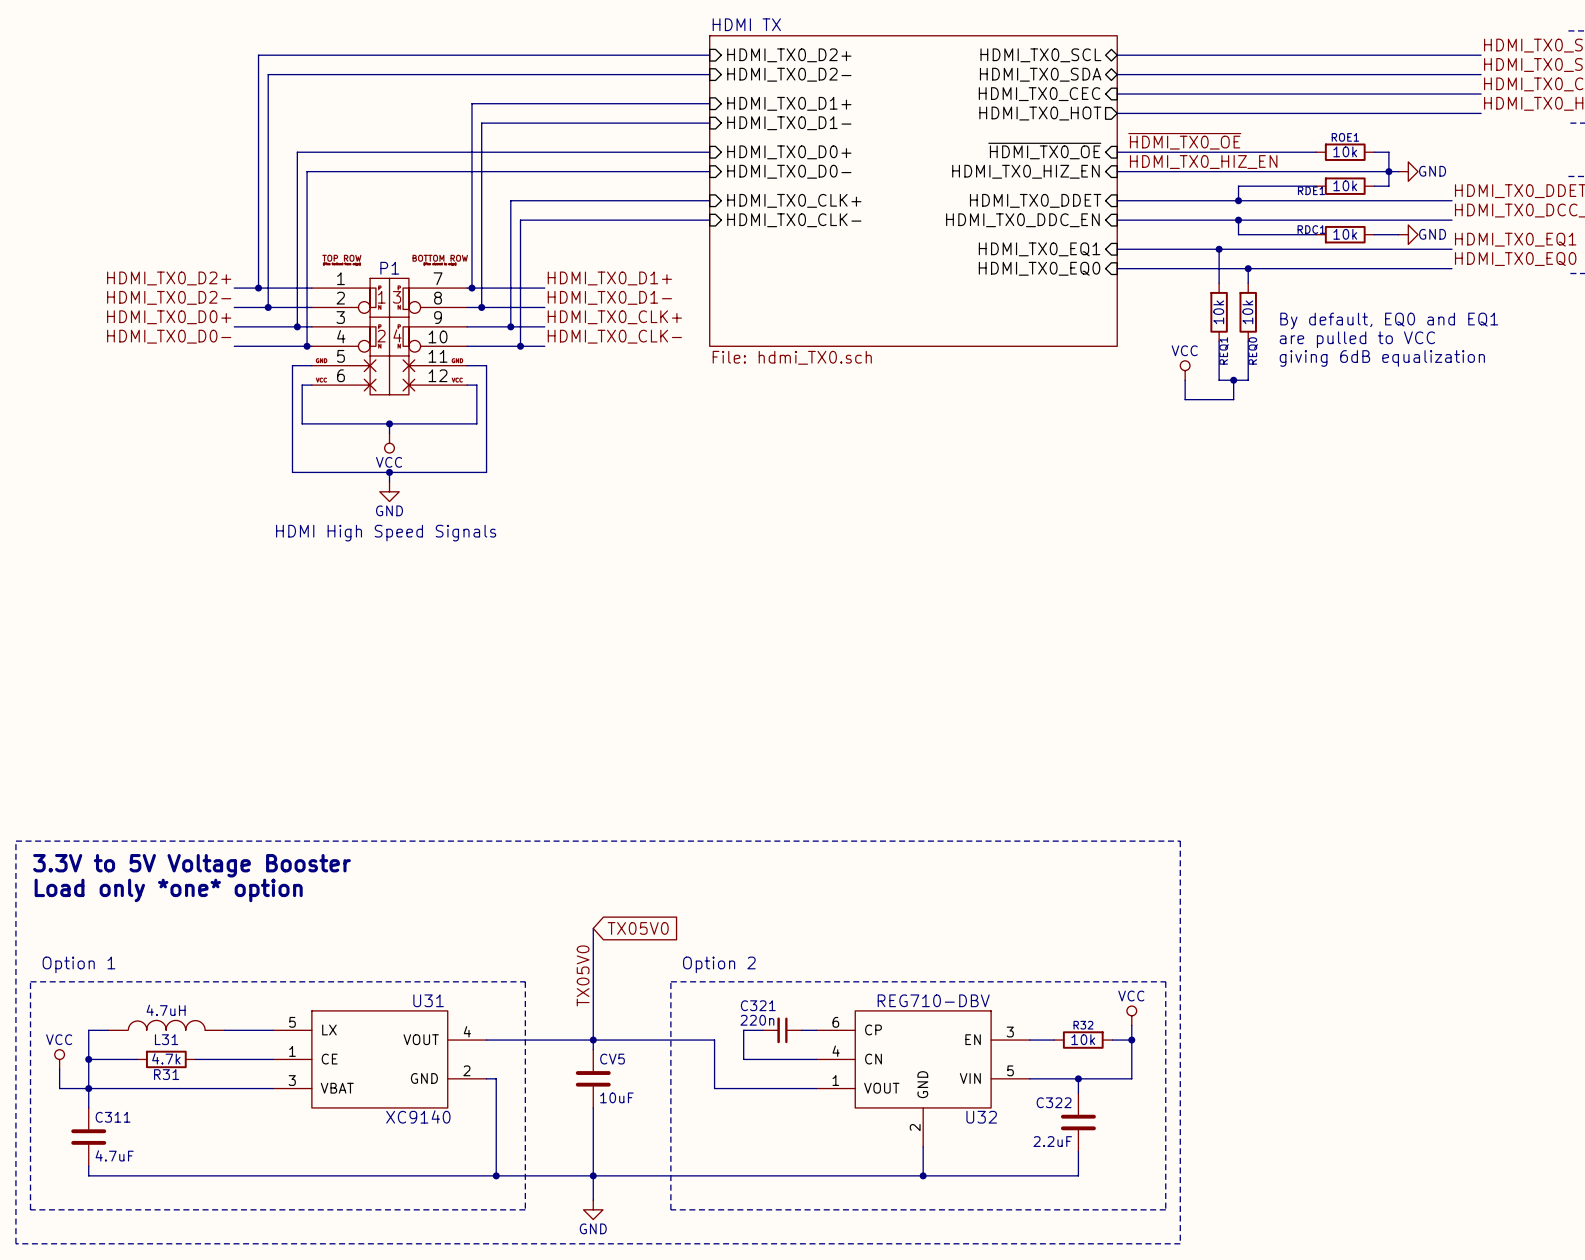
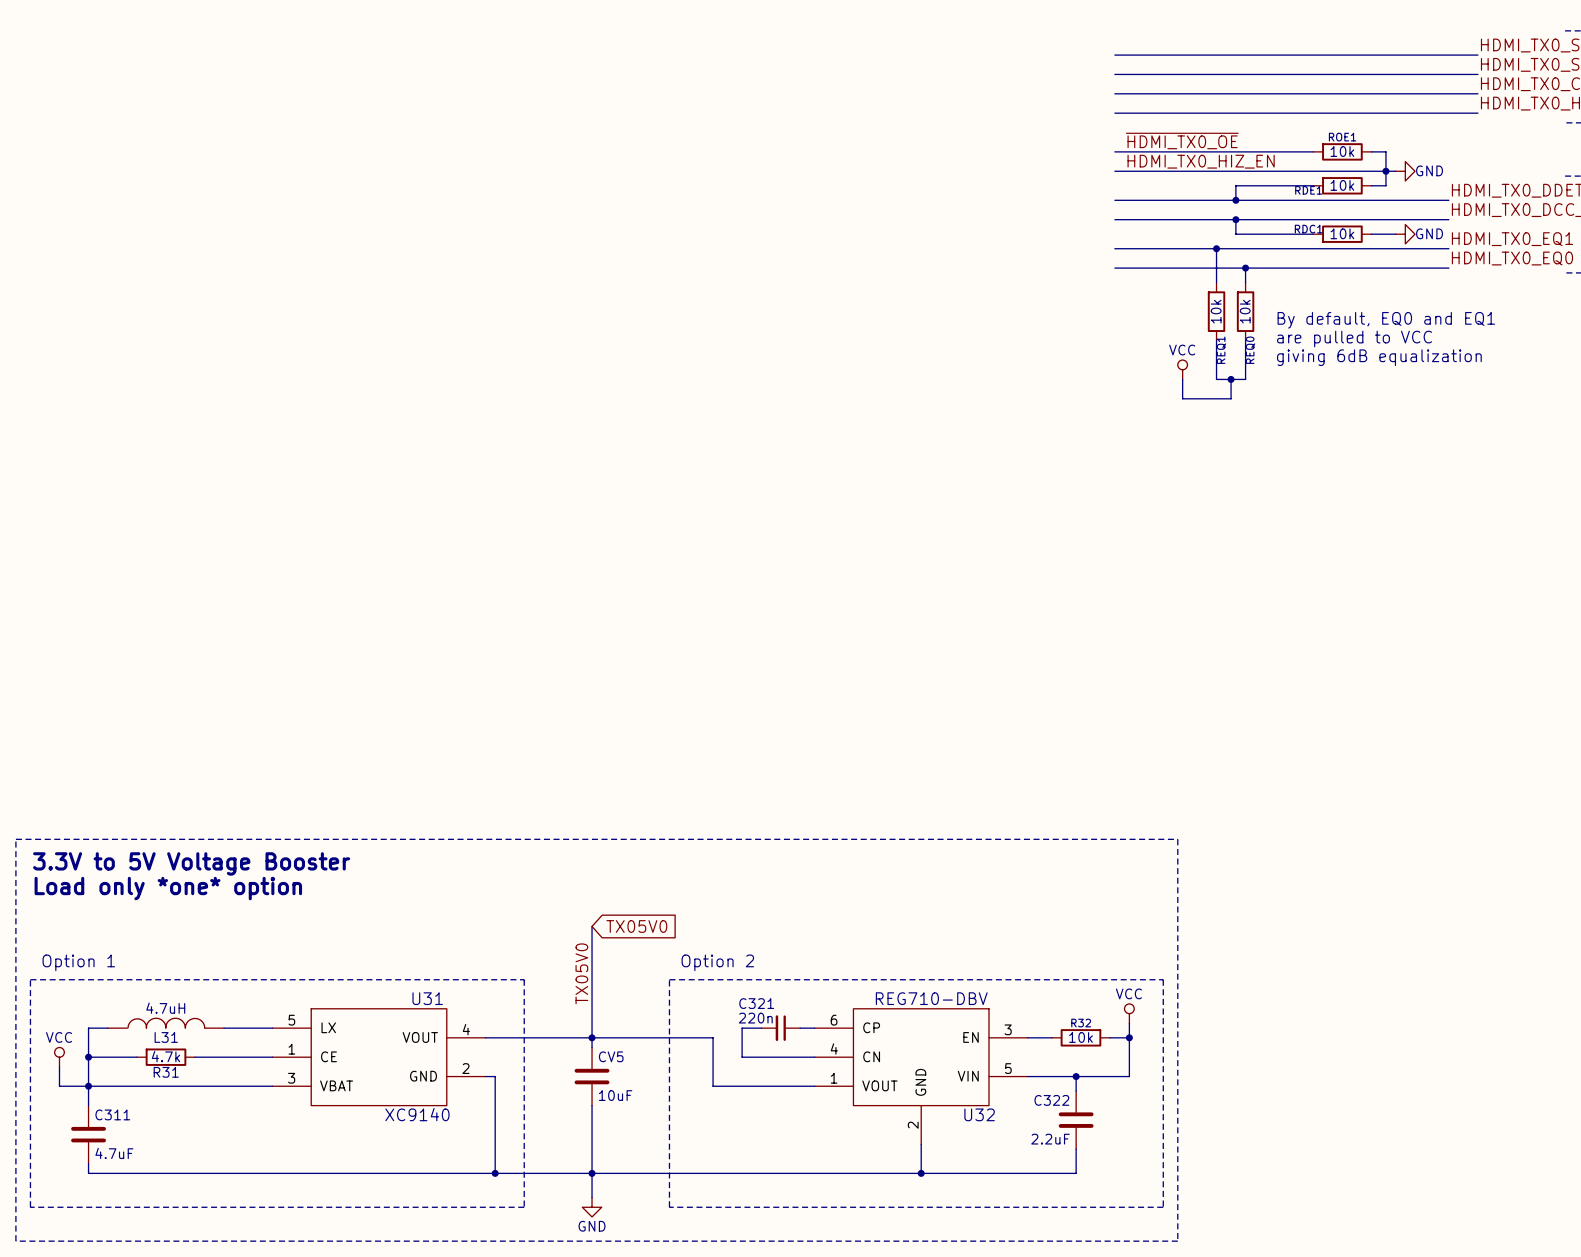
wire: (709, 55) (258, 55) (258, 288) -> none
sheet pin: HDMI_TX0_D2+ (789, 55) -> none
sheet pin: HDMI_TX0_SCL (1040, 55) -> none
wire: (709, 74) (268, 74) (268, 307) -> none
sheet pin: HDMI_TX0_D2- (789, 74) -> none
sheet pin: HDMI_TX0_SDA (1040, 74) -> none
sheet pin: HDMI_TX0_CEC (1039, 94) -> none
wire: (709, 103) (471, 103) (471, 288) -> none
sheet pin: HDMI_TX0_D1+ (789, 103) -> none
sheet pin: HDMI_TX0_HOT (1040, 113) -> none
wire: (709, 123) (481, 123) (481, 307) -> none
sheet pin: HDMI_TX0_D1- (789, 123) -> none
sheet pin: ~{HDMI_TX0_OE} (1044, 151) -> none
wire: (709, 152) (297, 152) (297, 326) -> none
sheet pin: HDMI_TX0_D0+ (789, 152) -> none
wire: (709, 171) (307, 171) (307, 346) -> none
sheet pin: HDMI_TX0_D0- (789, 171) -> none
sheet pin: HDMI_TX0_HIZ_EN (1025, 171) -> none
sheet HDMI TX: File: hdmi_TX0.sch (913, 191) -> none
wire: (709, 200) (510, 200) (510, 326) -> none
sheet pin: HDMI_TX0_CLK+ (794, 200) -> none
sheet pin: HDMI_TX0_DDET (1035, 200) -> none
wire: (709, 220) (520, 220) (520, 346) -> none
sheet pin: HDMI_TX0_CLK- (794, 220) -> none
sheet pin: HDMI_TX0_DDC_EN (1022, 220) -> none
sheet pin: HDMI_TX0_EQ1 (1039, 249) -> none
sheet pin: HDMI_TX0_EQ0 (1039, 268) -> none
label: HDMI_TX0_D2+ (169, 278) -> none
label: HDMI_TX0_D1+ (609, 278) -> none
wire: (234, 288) (311, 288) -> none
junction: (258, 288) -> none
wire: (467, 288) (544, 288) -> none
junction: (471, 288) -> none
label: HDMI_TX0_D2- (169, 297) -> none
label: HDMI_TX0_D1- (609, 297) -> none
wire: (234, 307) (311, 307) -> none
junction: (268, 307) -> none
wire: (467, 307) (544, 307) -> none
junction: (481, 307) -> none
label: HDMI_TX0_D0+ (169, 317) -> none
label: HDMI_TX0_CLK+ (614, 317) -> none
wire: (234, 326) (311, 326) -> none
junction: (297, 326) -> none
wire: (467, 326) (544, 326) -> none
junction: (510, 326) -> none
label: HDMI_TX0_D0- (169, 336) -> none
P1: (389, 336) -> none
label: HDMI_TX0_CLK- (614, 336) -> none
wire: (234, 346) (311, 346) -> none
junction: (307, 346) -> none
wire: (467, 346) (544, 346) -> none
junction: (520, 346) -> none
wire: (311, 365) (292, 365) (292, 472) (486, 472) (486, 365) (467, 365) -> none
wire: (311, 385) (302, 385) (302, 423) (476, 423) (476, 385) (467, 385) -> none
wire: (389, 423) (389, 433) -> none
junction: (389, 423) -> none
power symbol: VCC (389, 443) -> none
wire: (389, 472) (389, 482) -> none
junction: (389, 472) -> none
power symbol: GND (389, 491) -> none
text: HDMI High Speed Signals (386, 533) -> none

